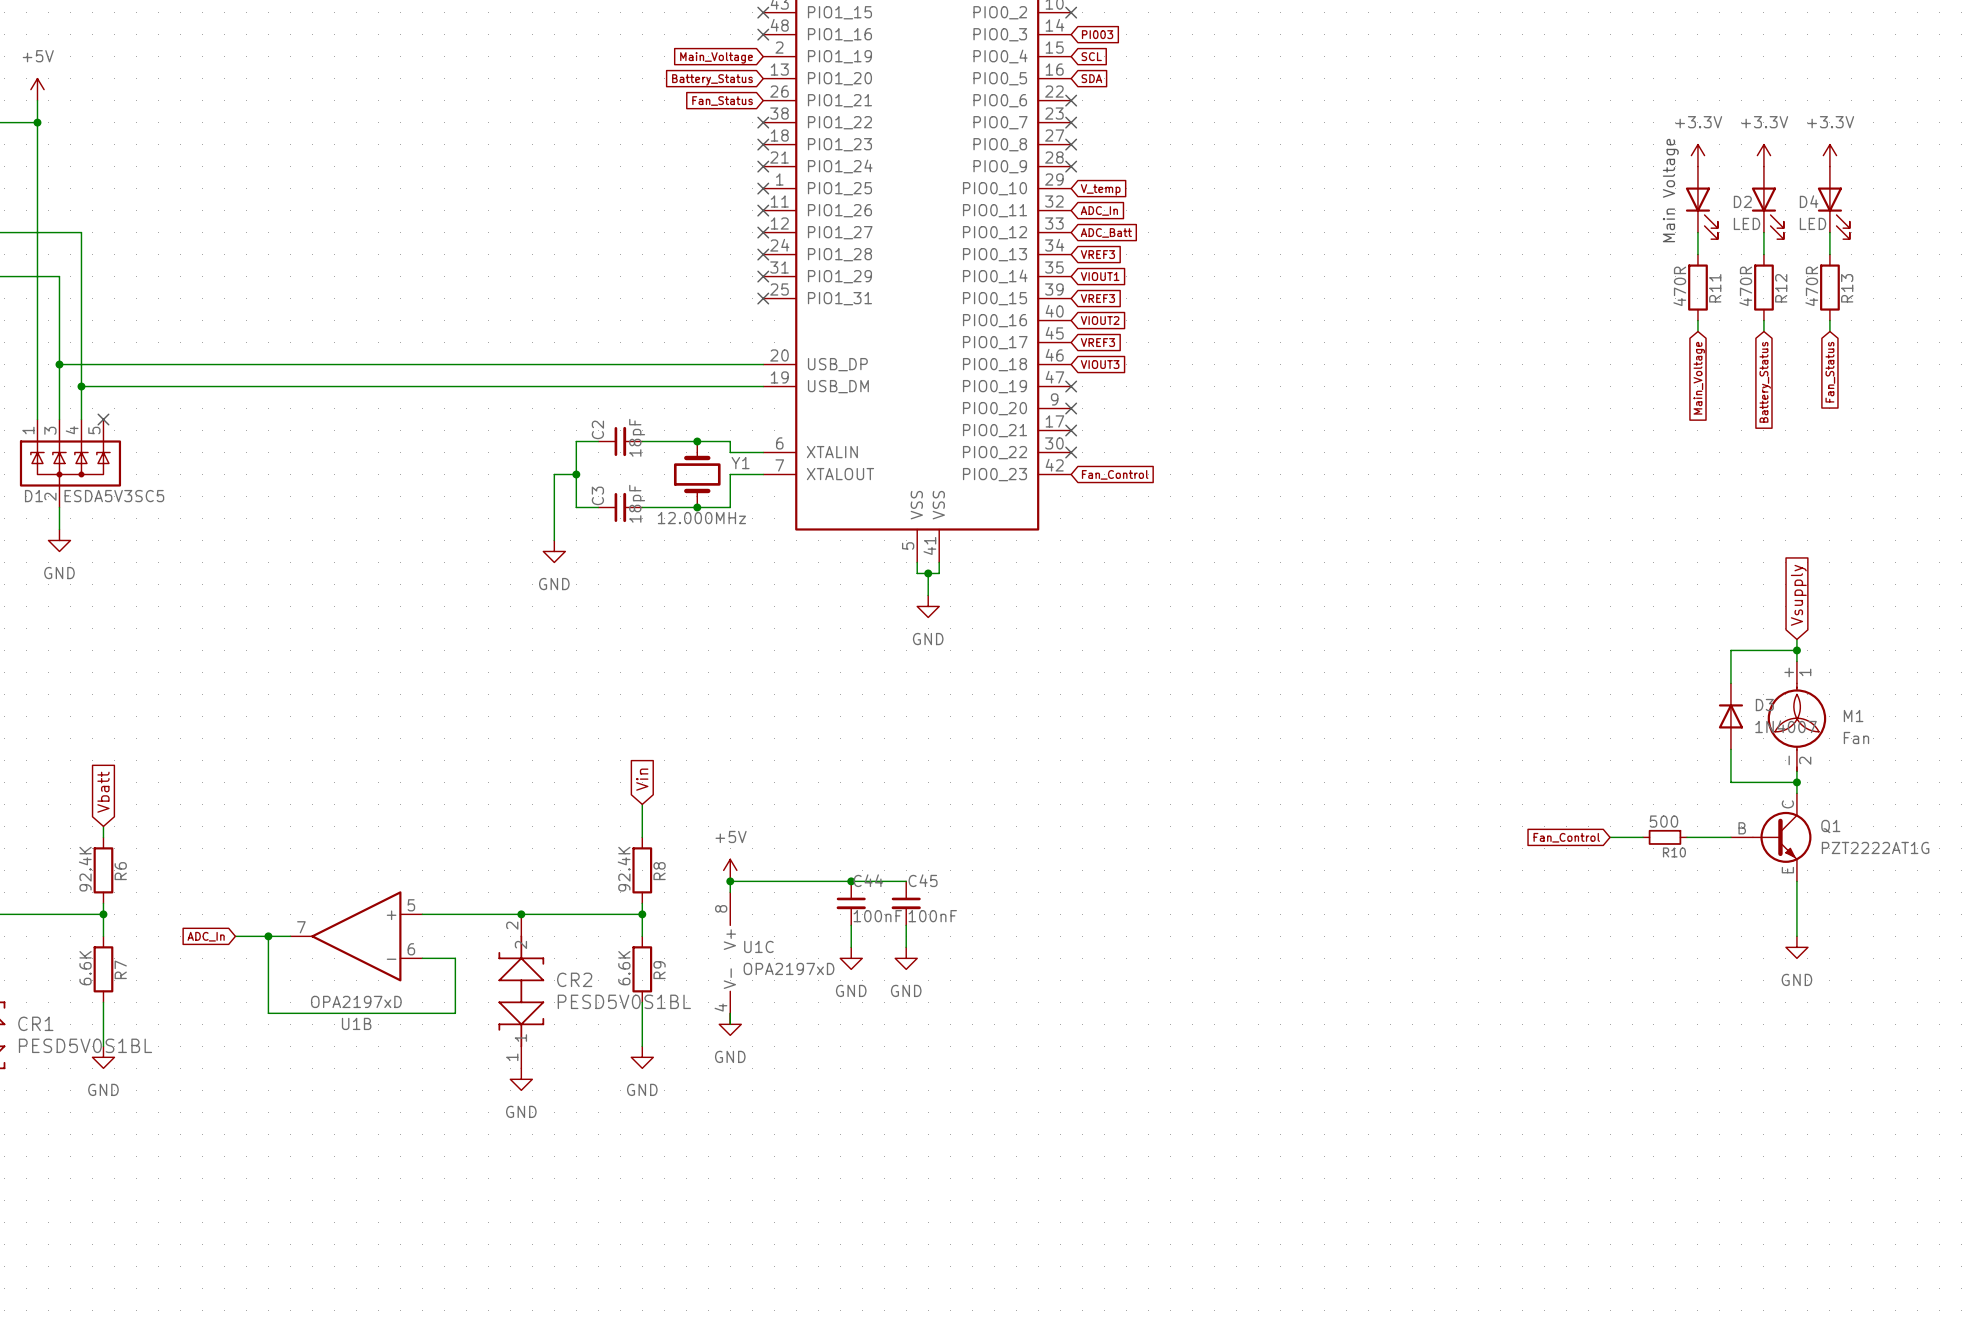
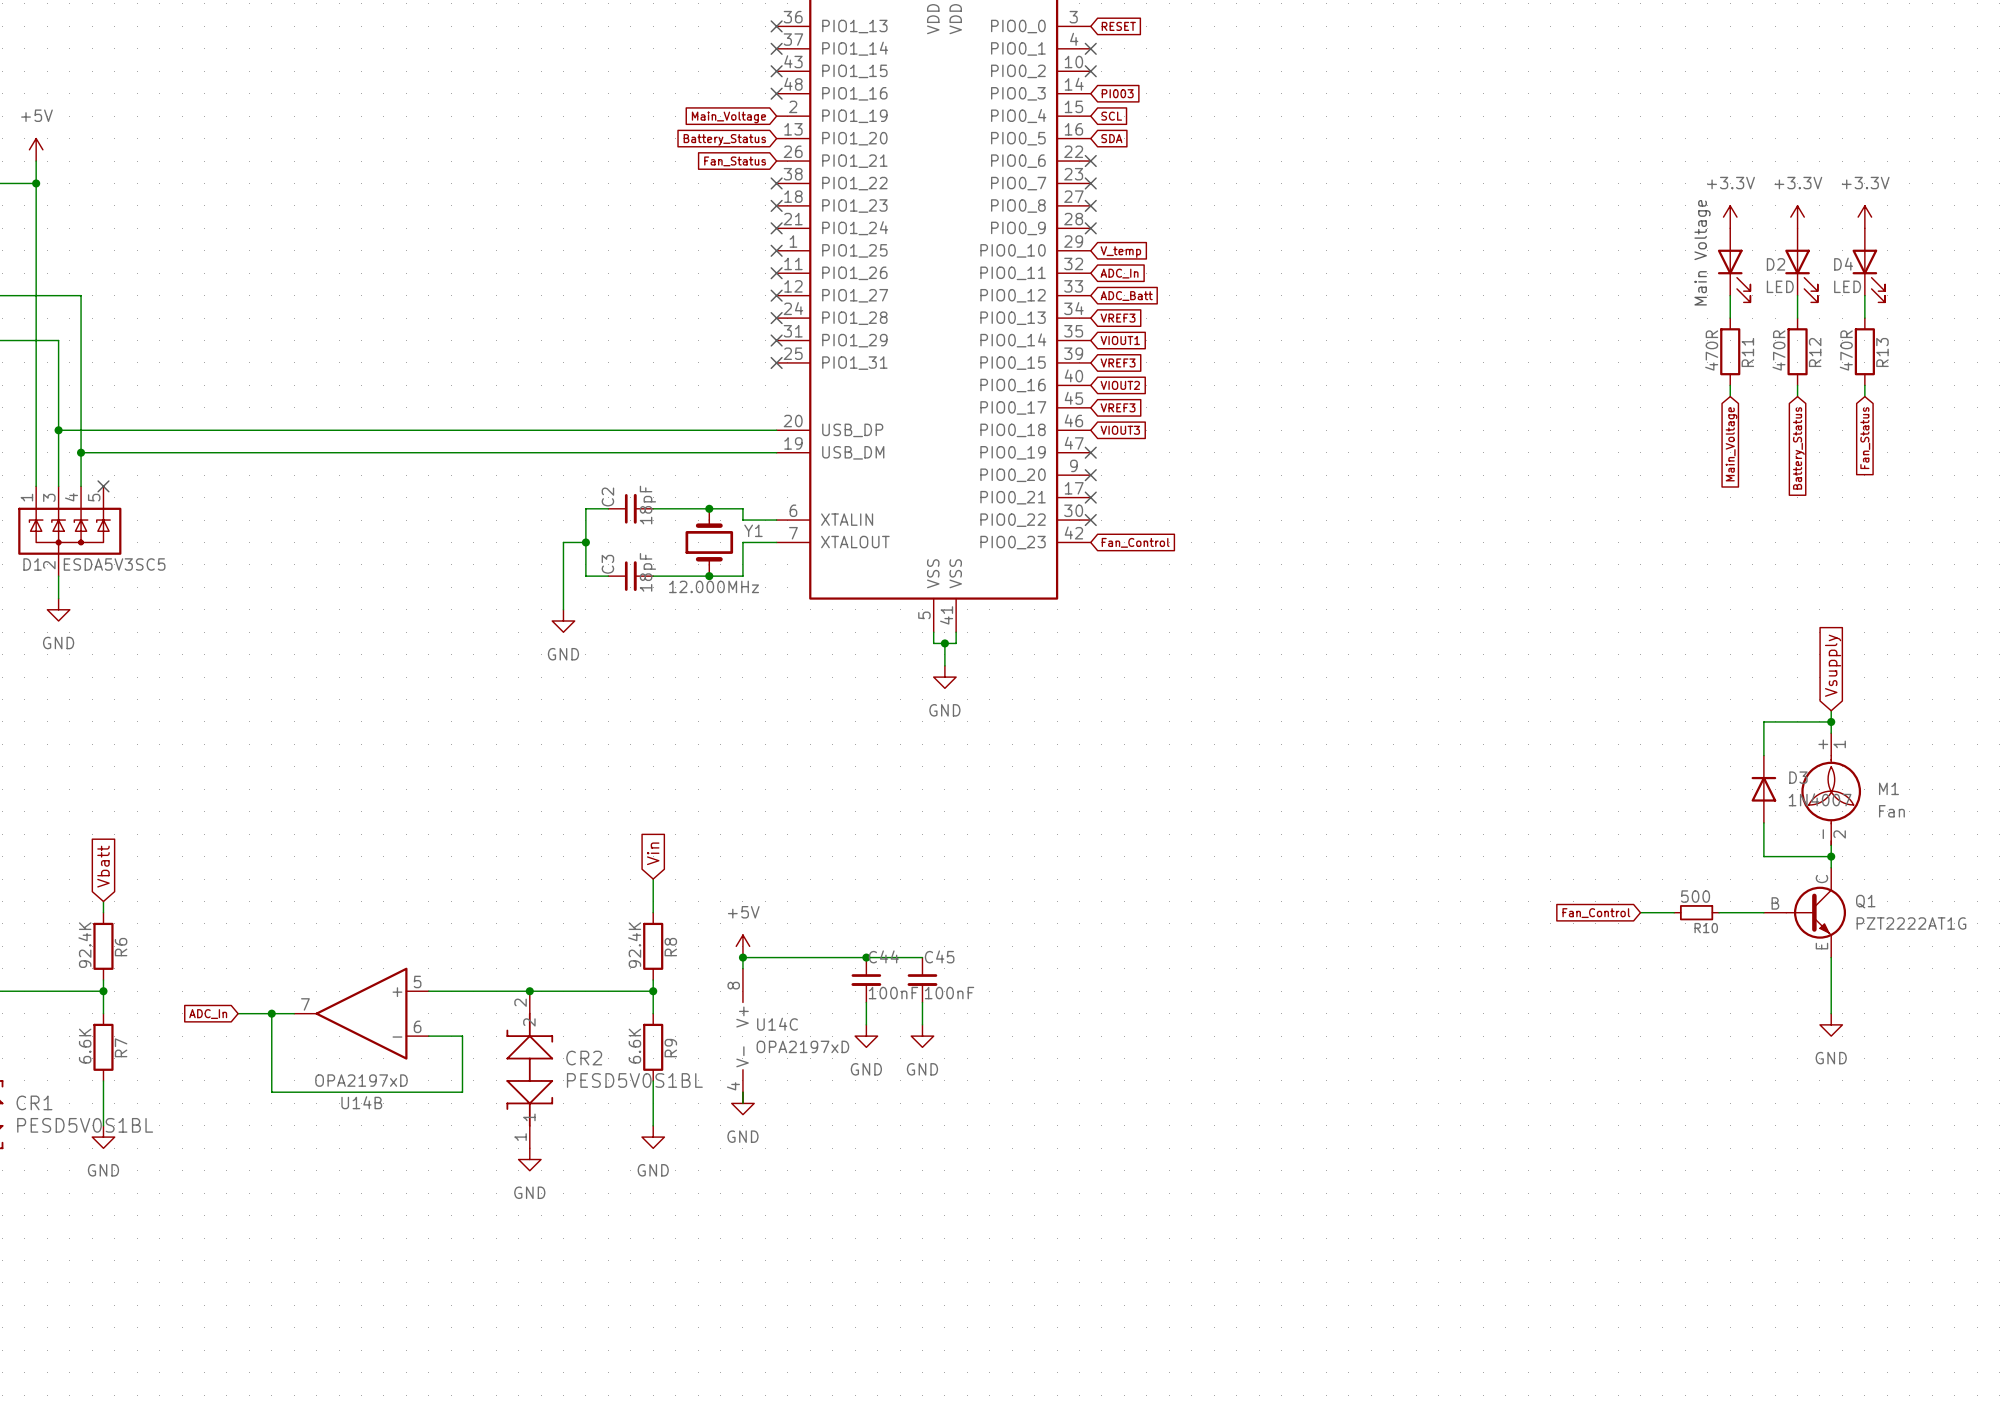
U1C name: U1C (758, 946) -> U14C (777, 1024)
U1B name: U1B (356, 1023) -> U14B (361, 1102)

